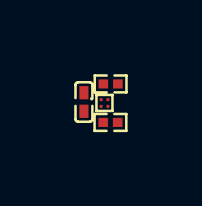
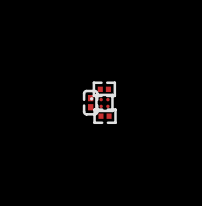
part footprint: [93, 74, 128, 94] -> [92, 81, 117, 98]
part footprint: [74, 80, 94, 124] -> [82, 89, 99, 116]
part footprint: [93, 112, 128, 133] -> [93, 108, 117, 125]

